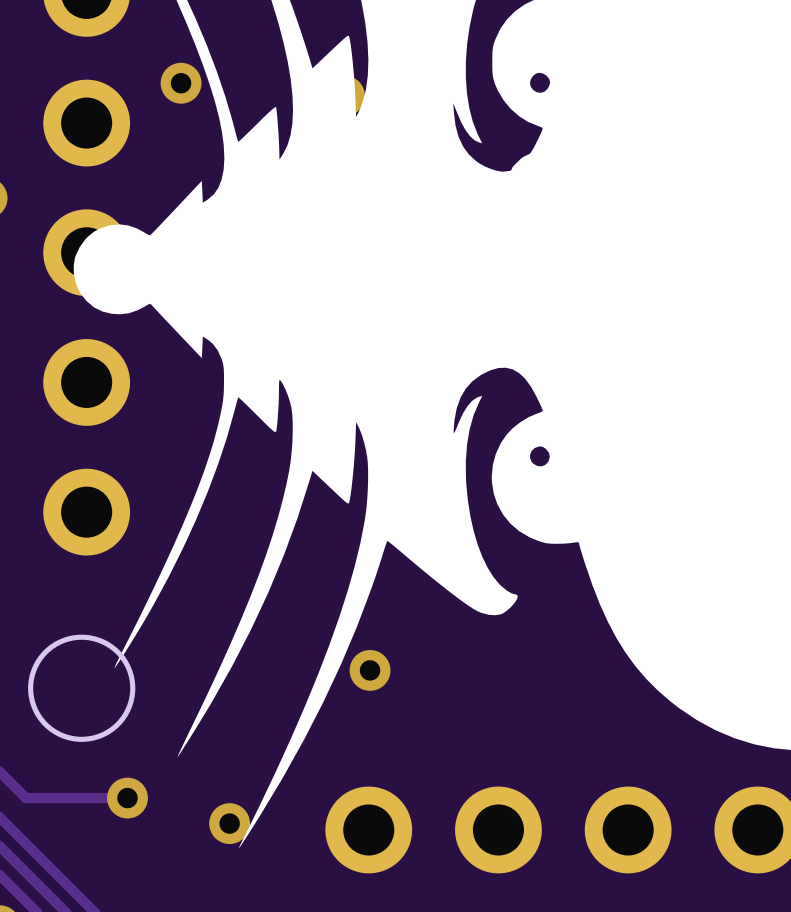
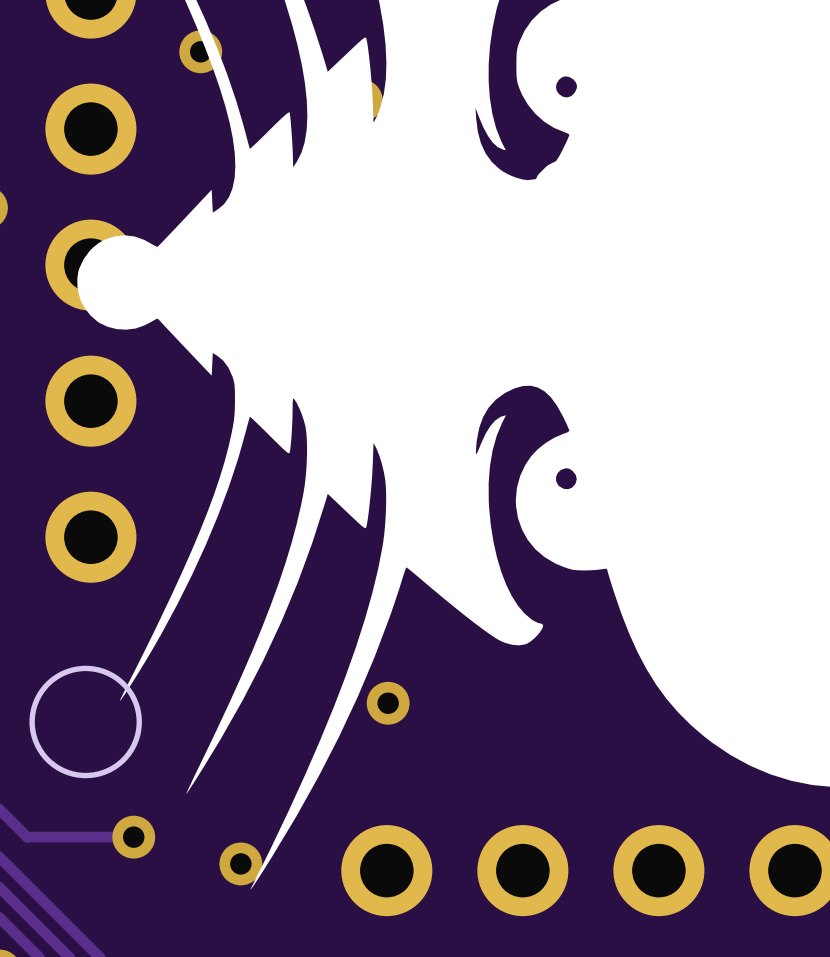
via position: (181, 83) -> (200, 51)

